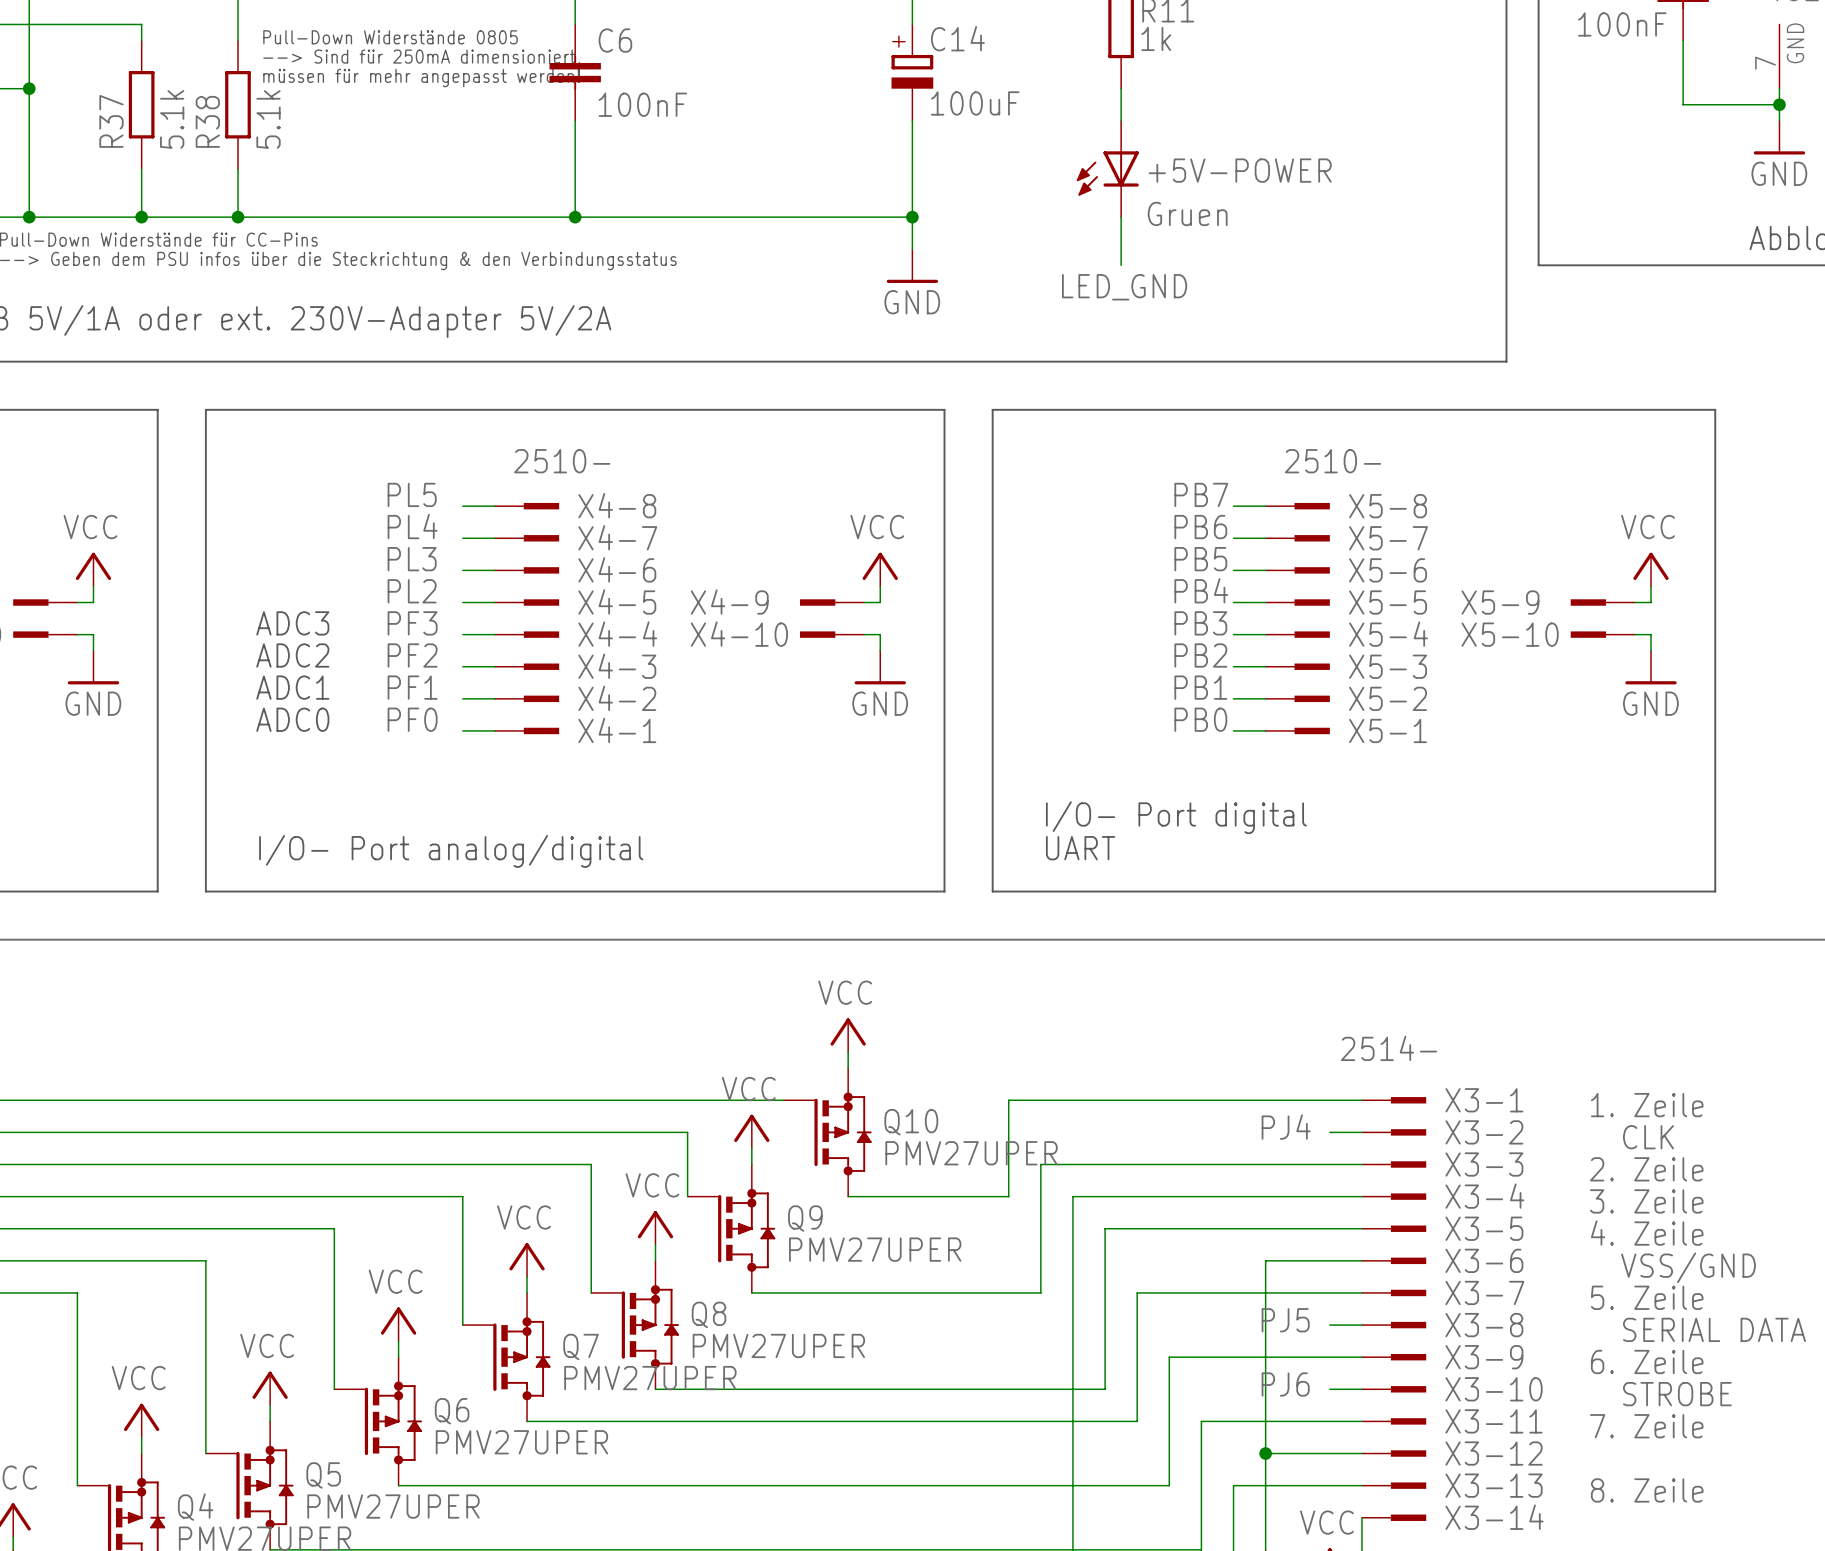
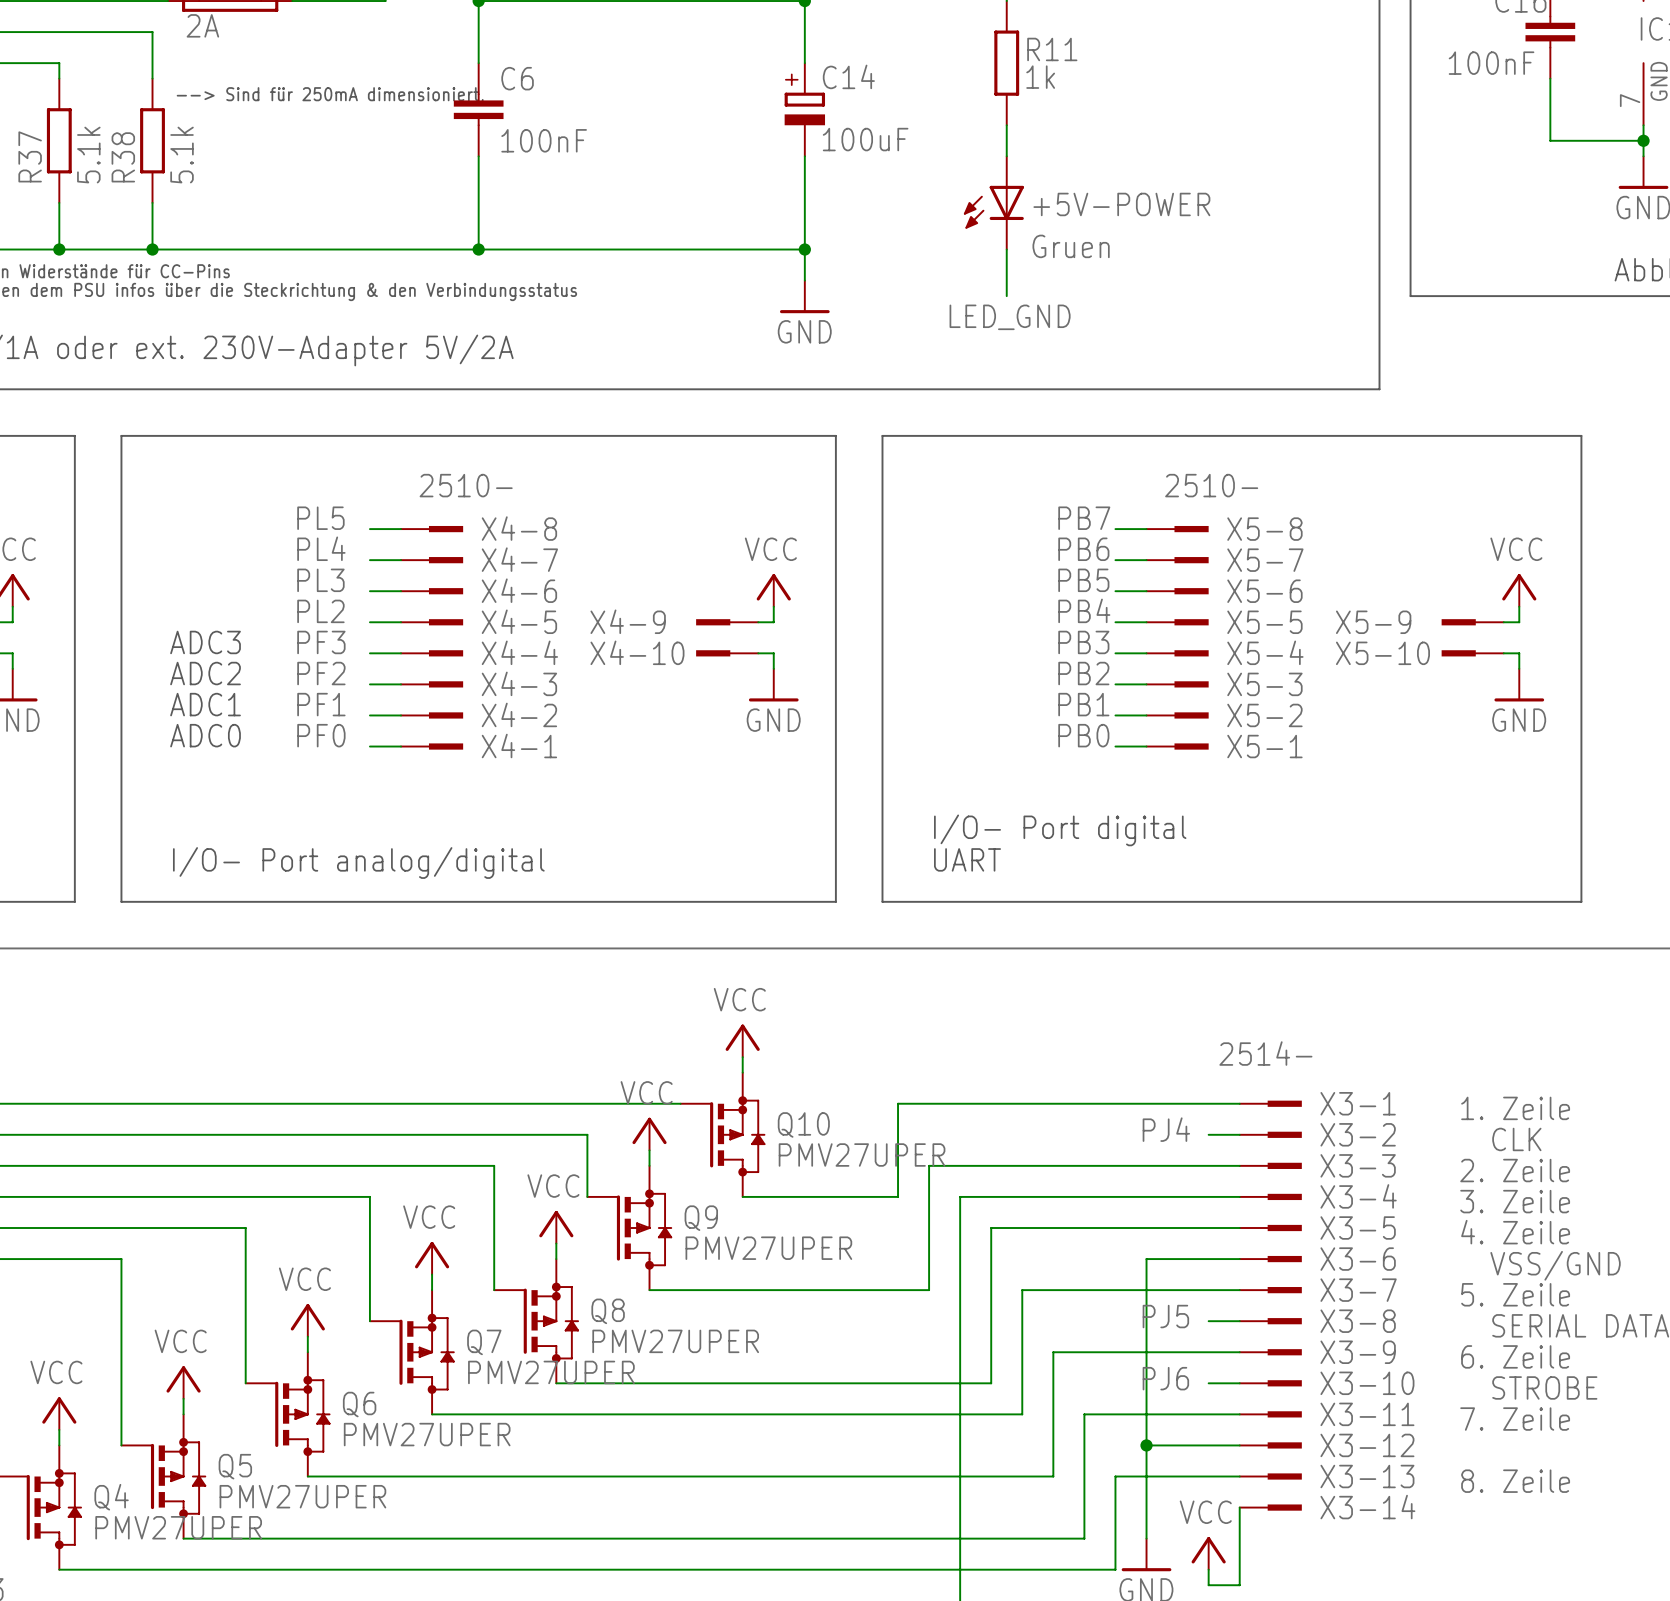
text: Pull-Down Widerstände 0805 (390, 37) -> none
text: müssen für mehr angepasst werden! (421, 77) -> none

